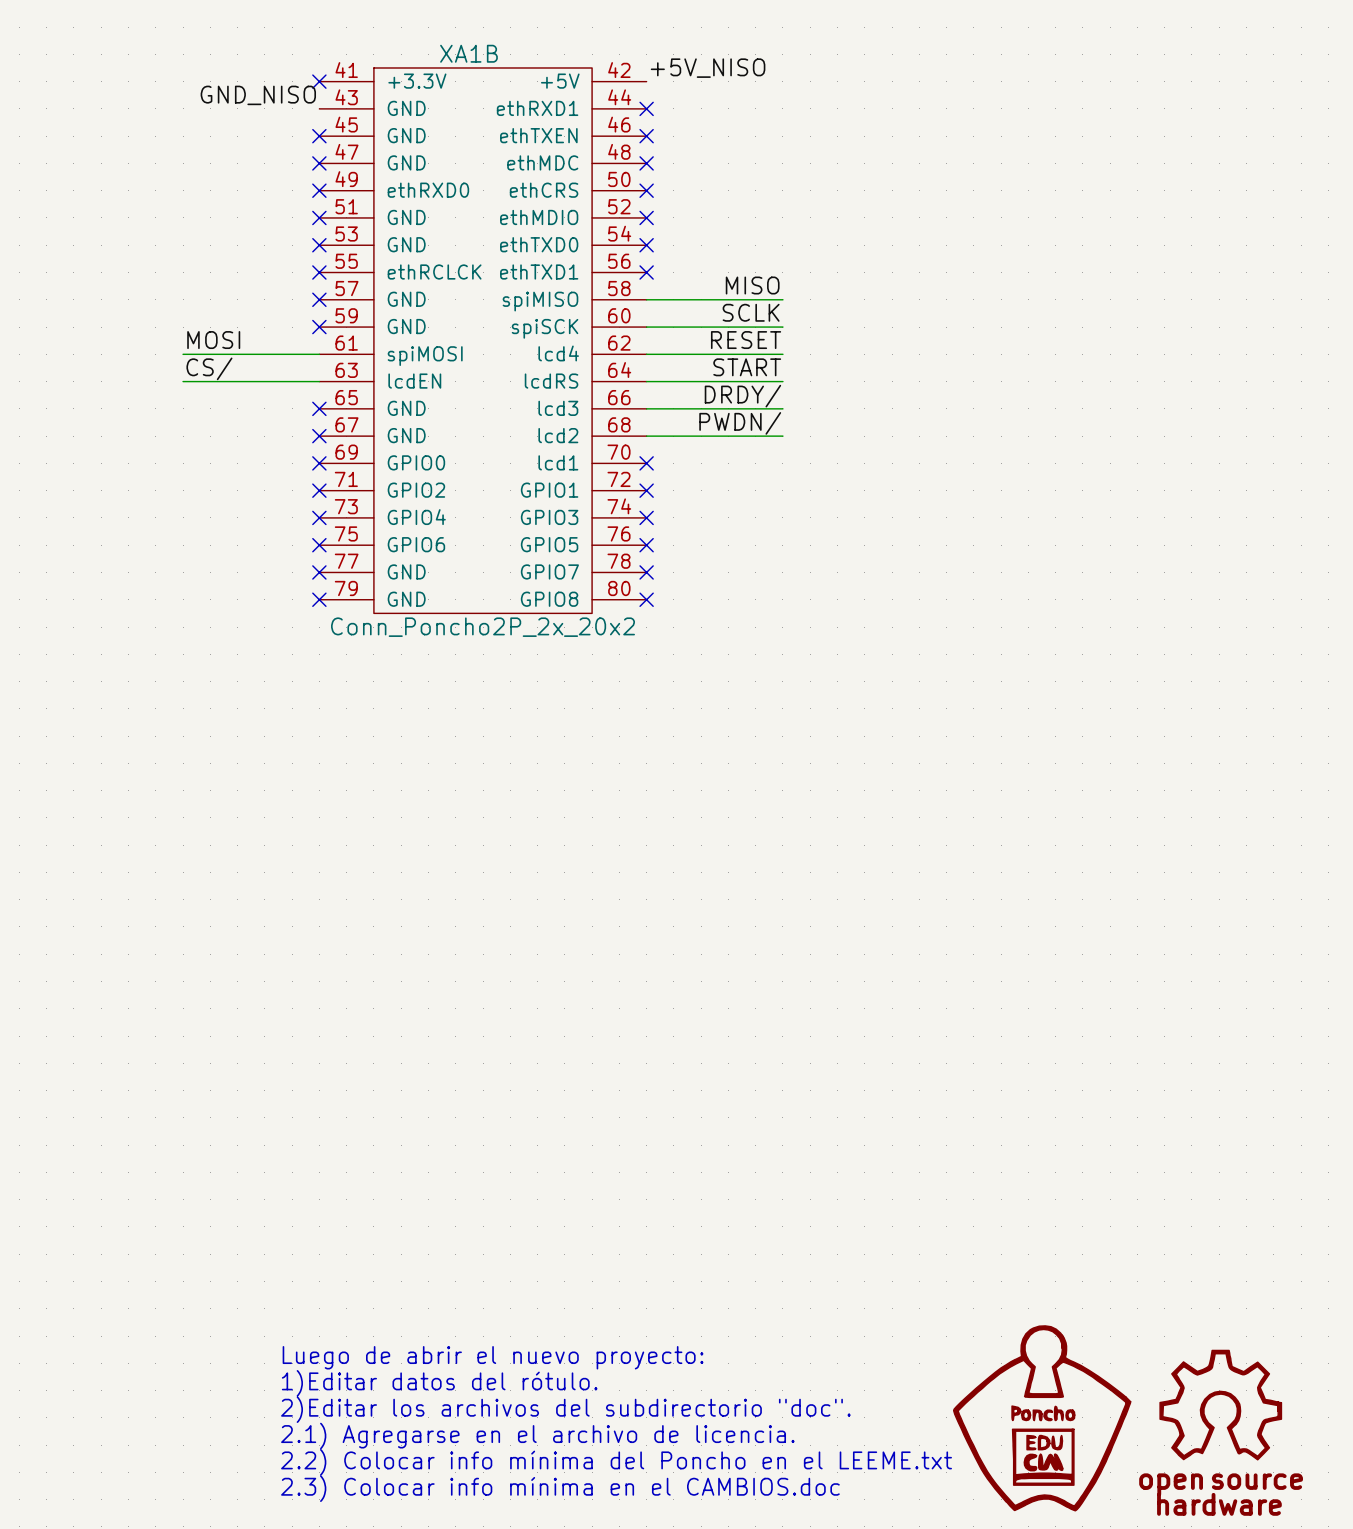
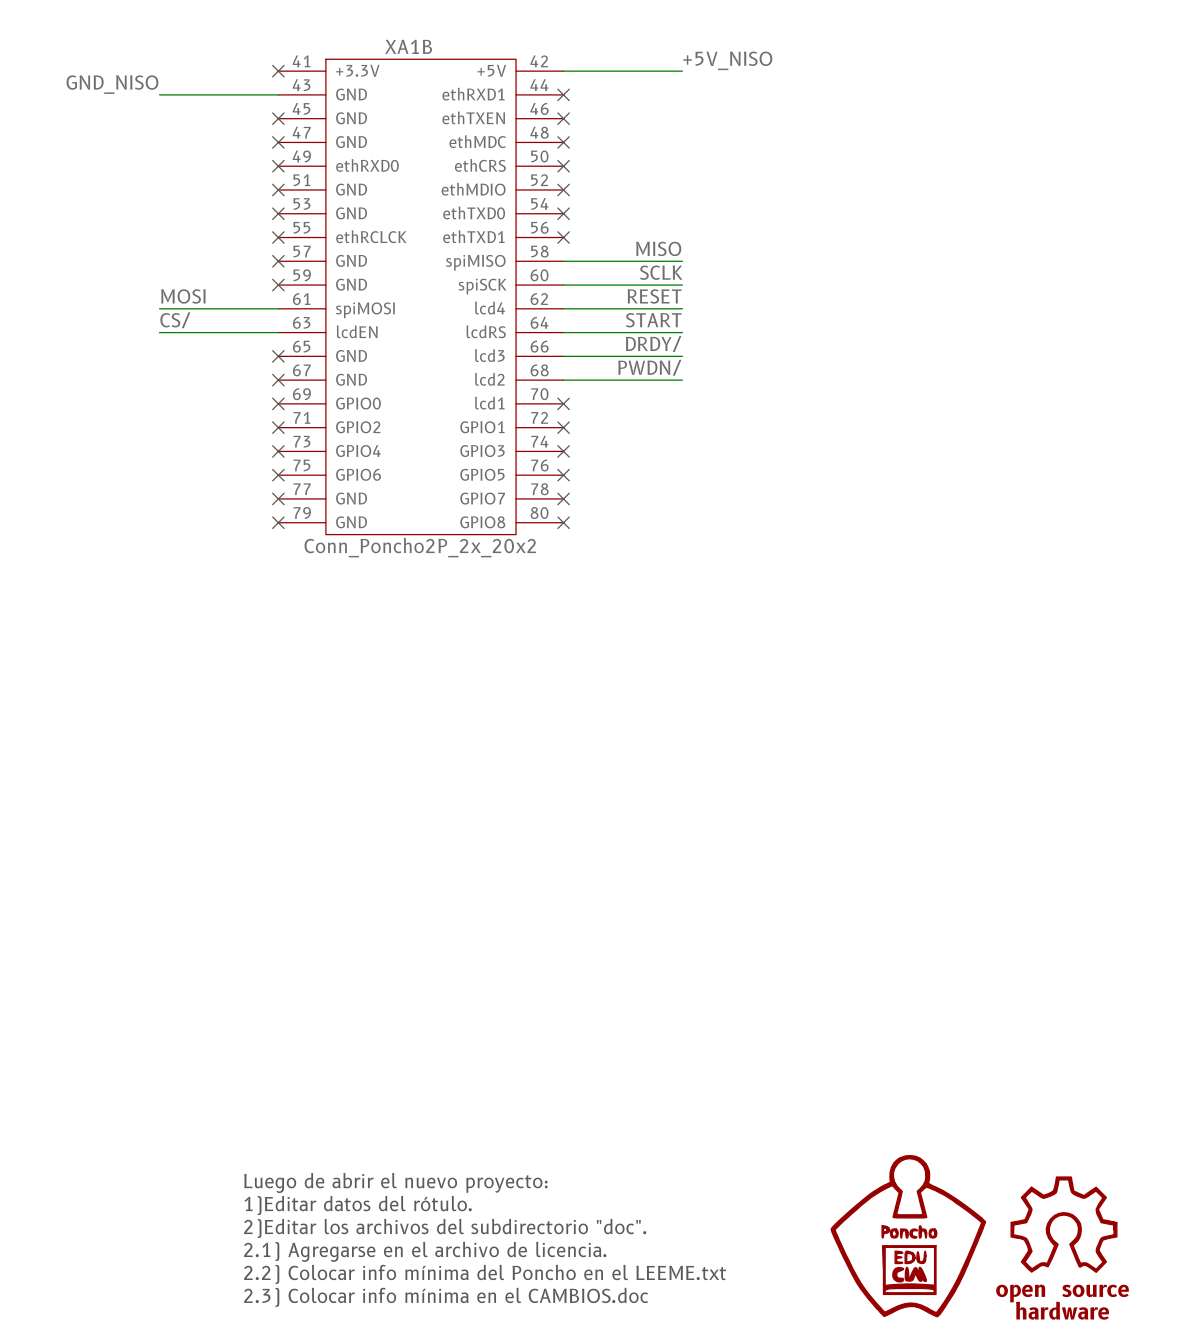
label position: +5V_NISO (708, 68) -> +5V_NISO (727, 60)
wire: none -> (563, 71) (682, 71)
label position: GND_NISO (258, 95) -> GND_NISO (112, 84)
wire: none -> (159, 94) (278, 94)

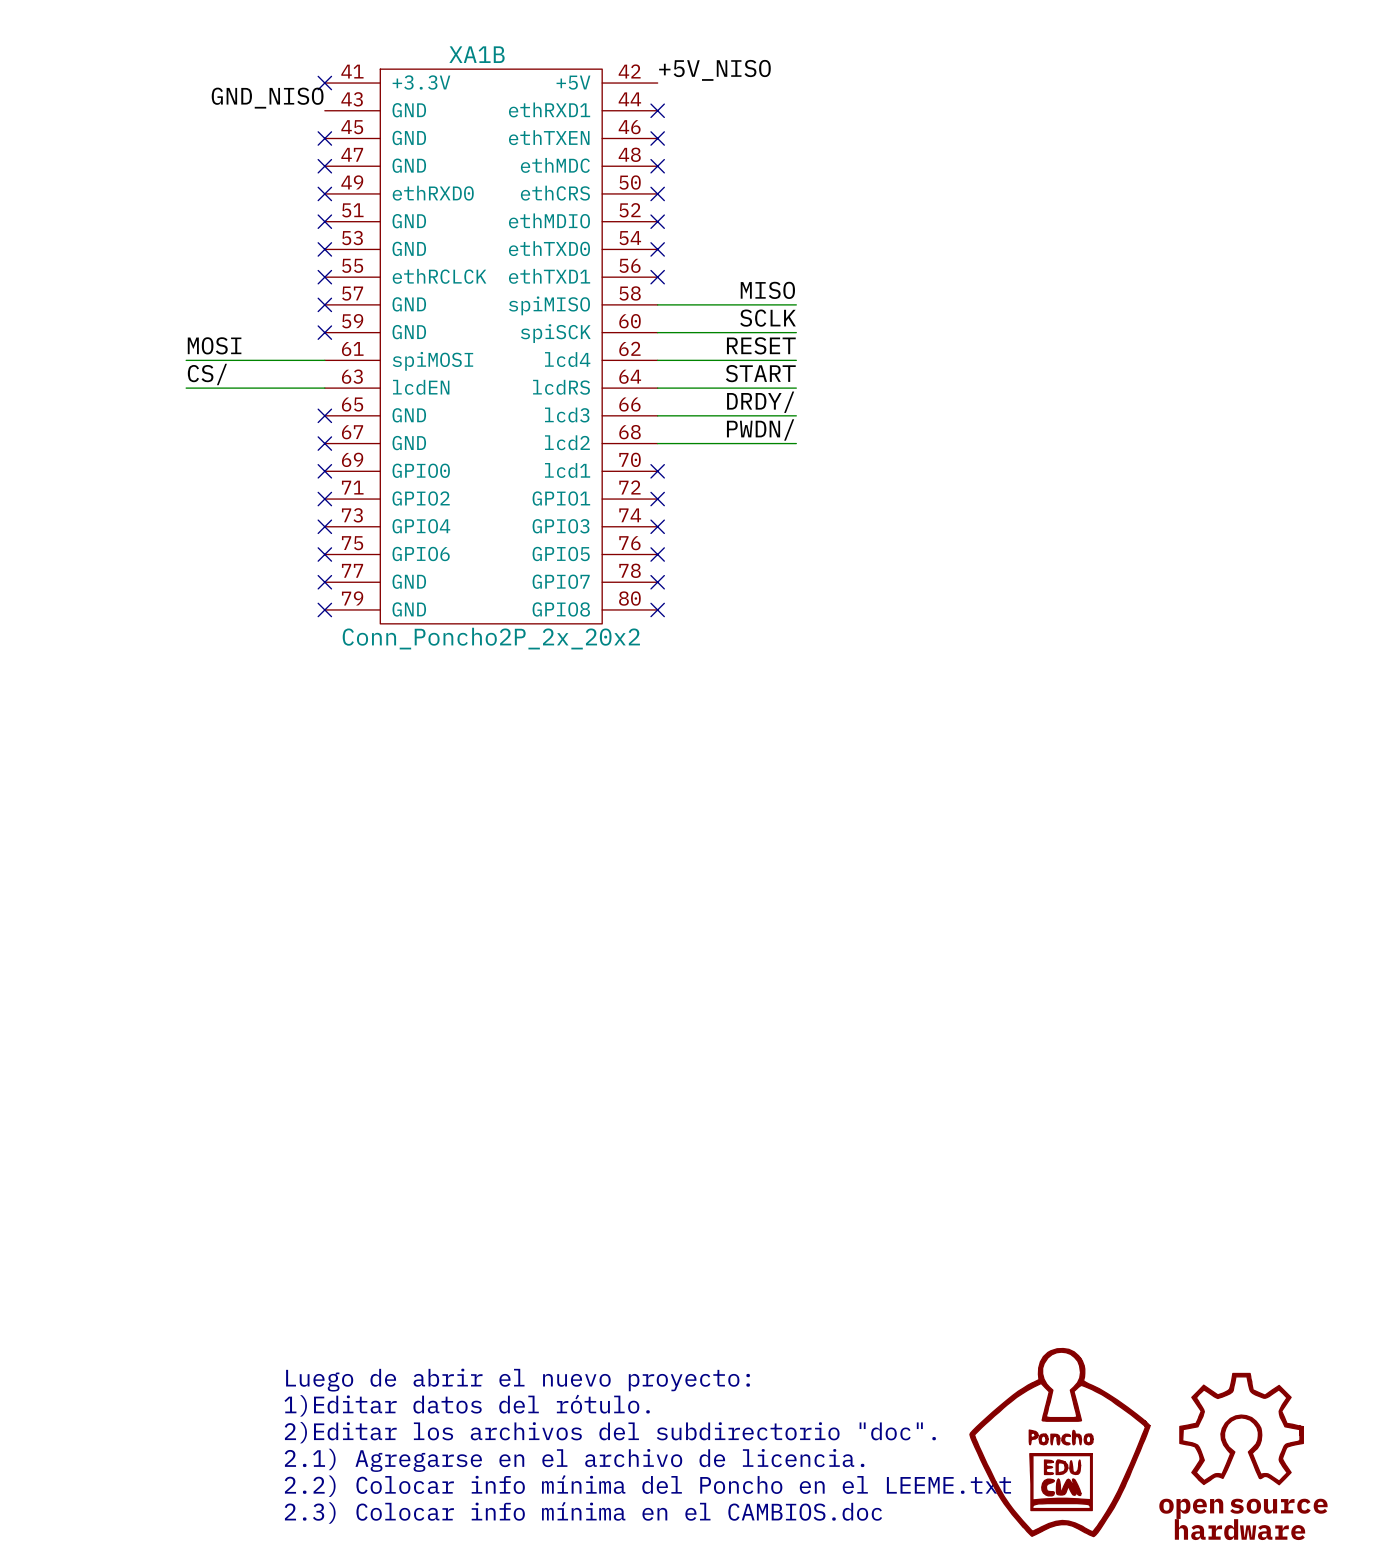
label position: +5V_NISO (727, 60) -> +5V_NISO (714, 70)
wire: (563, 71) (682, 71) -> none
label position: GND_NISO (112, 84) -> GND_NISO (267, 98)
wire: (159, 94) (278, 94) -> none

